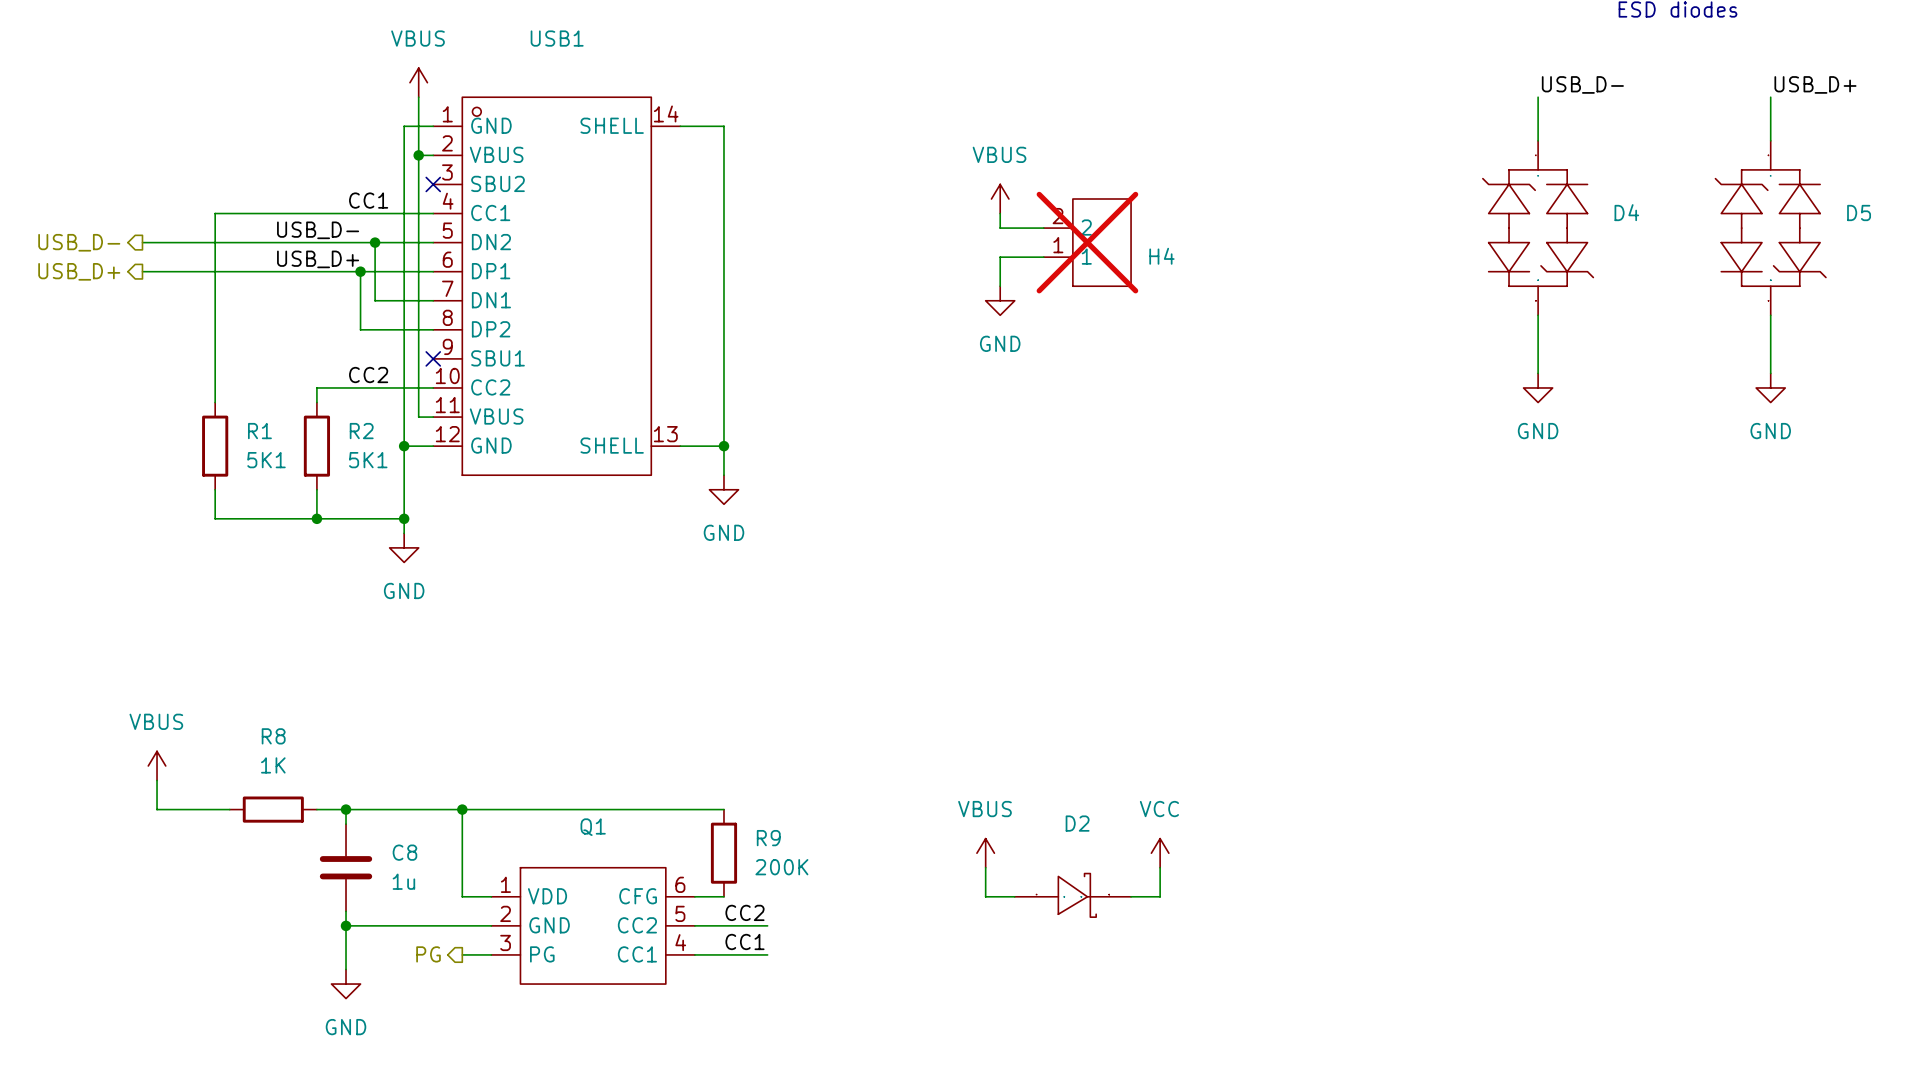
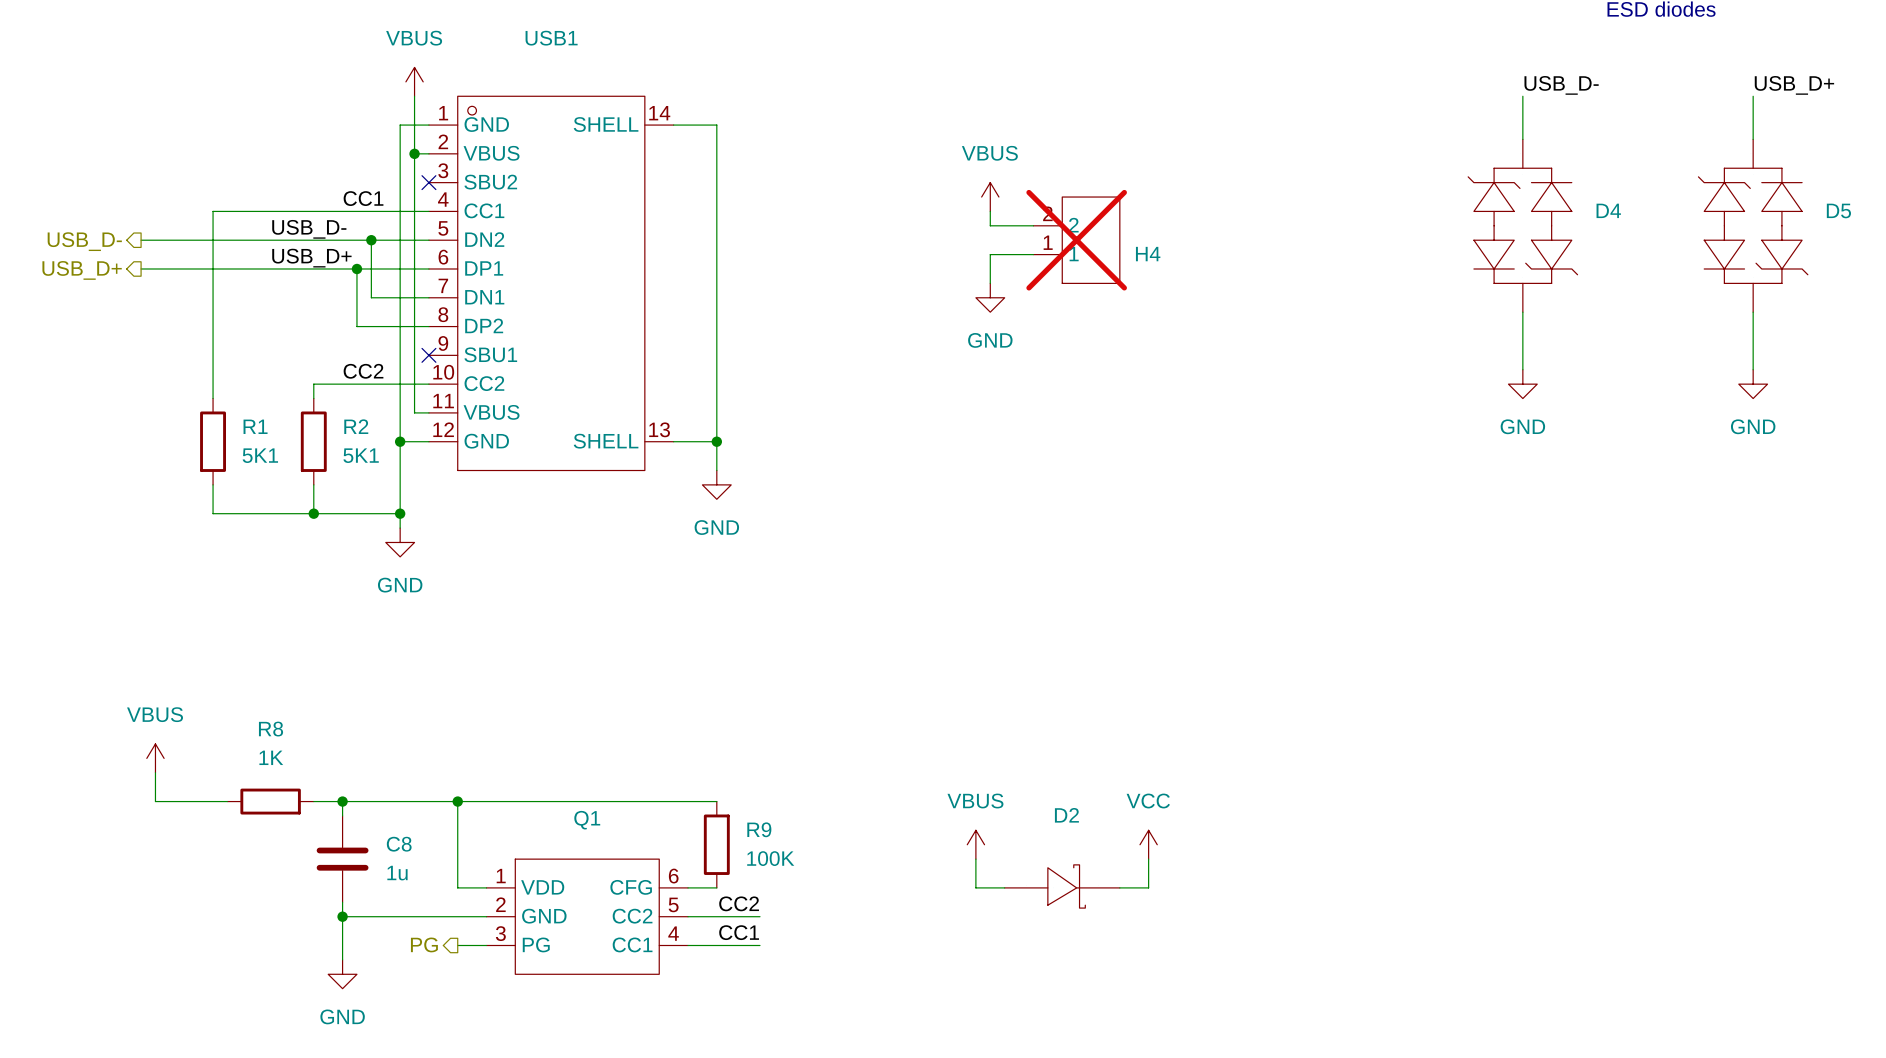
R9 value: 200K (781, 867) -> 100K (770, 858)

